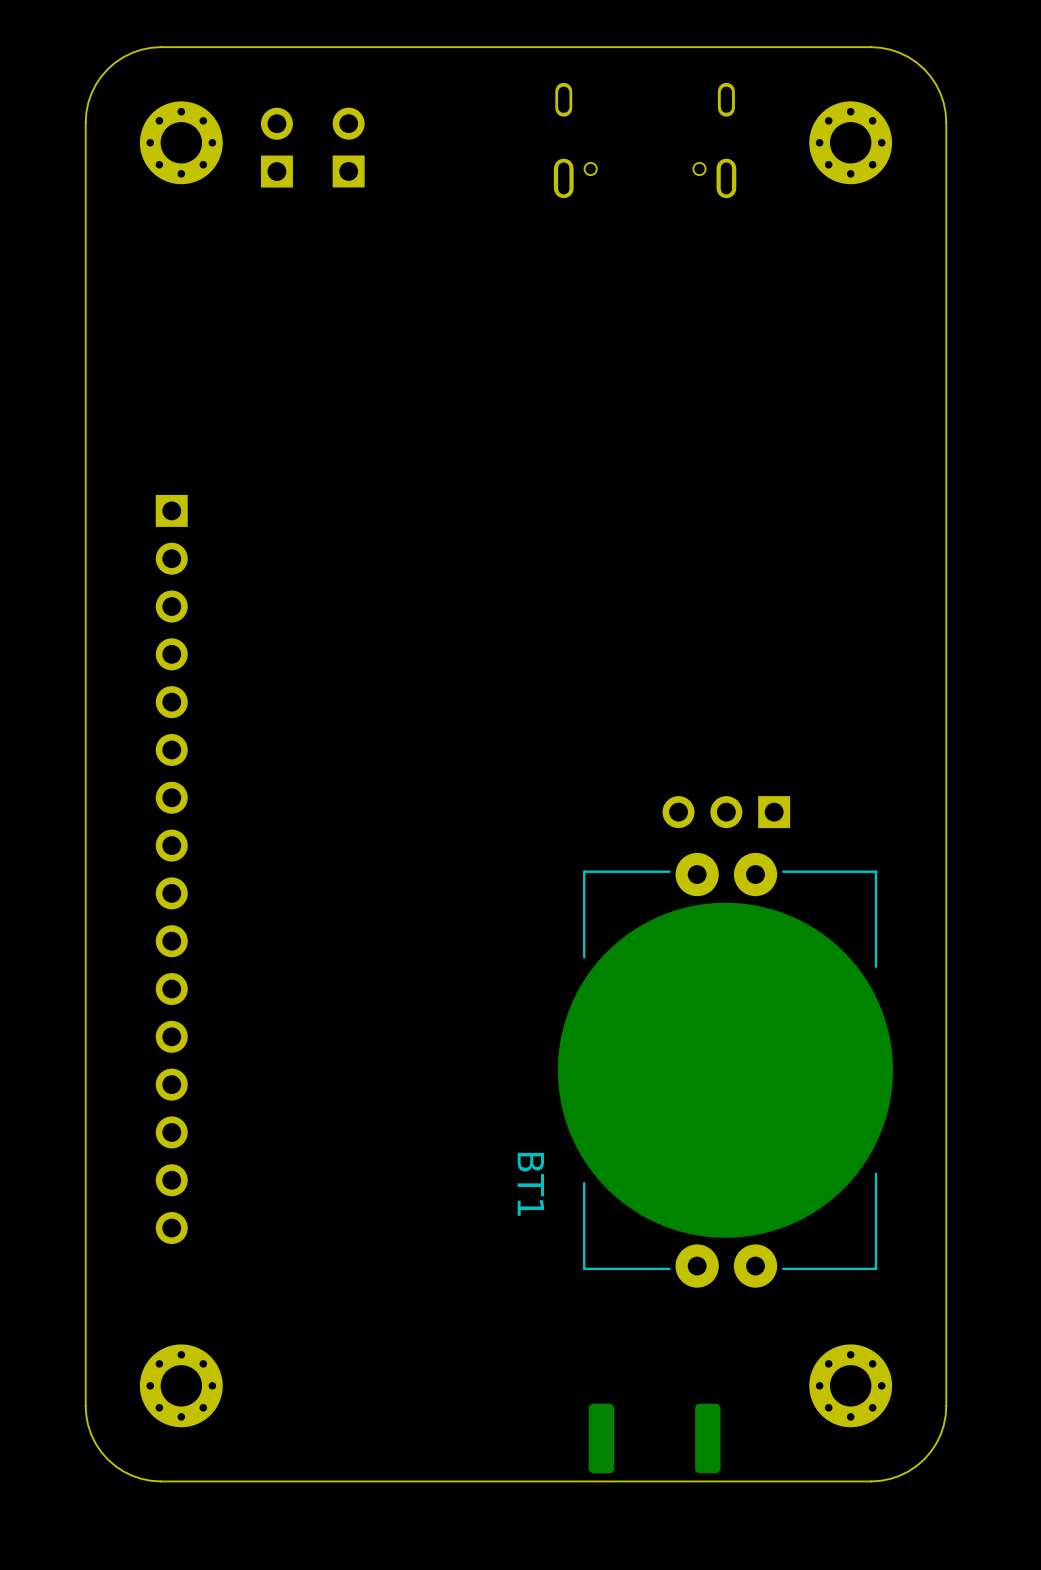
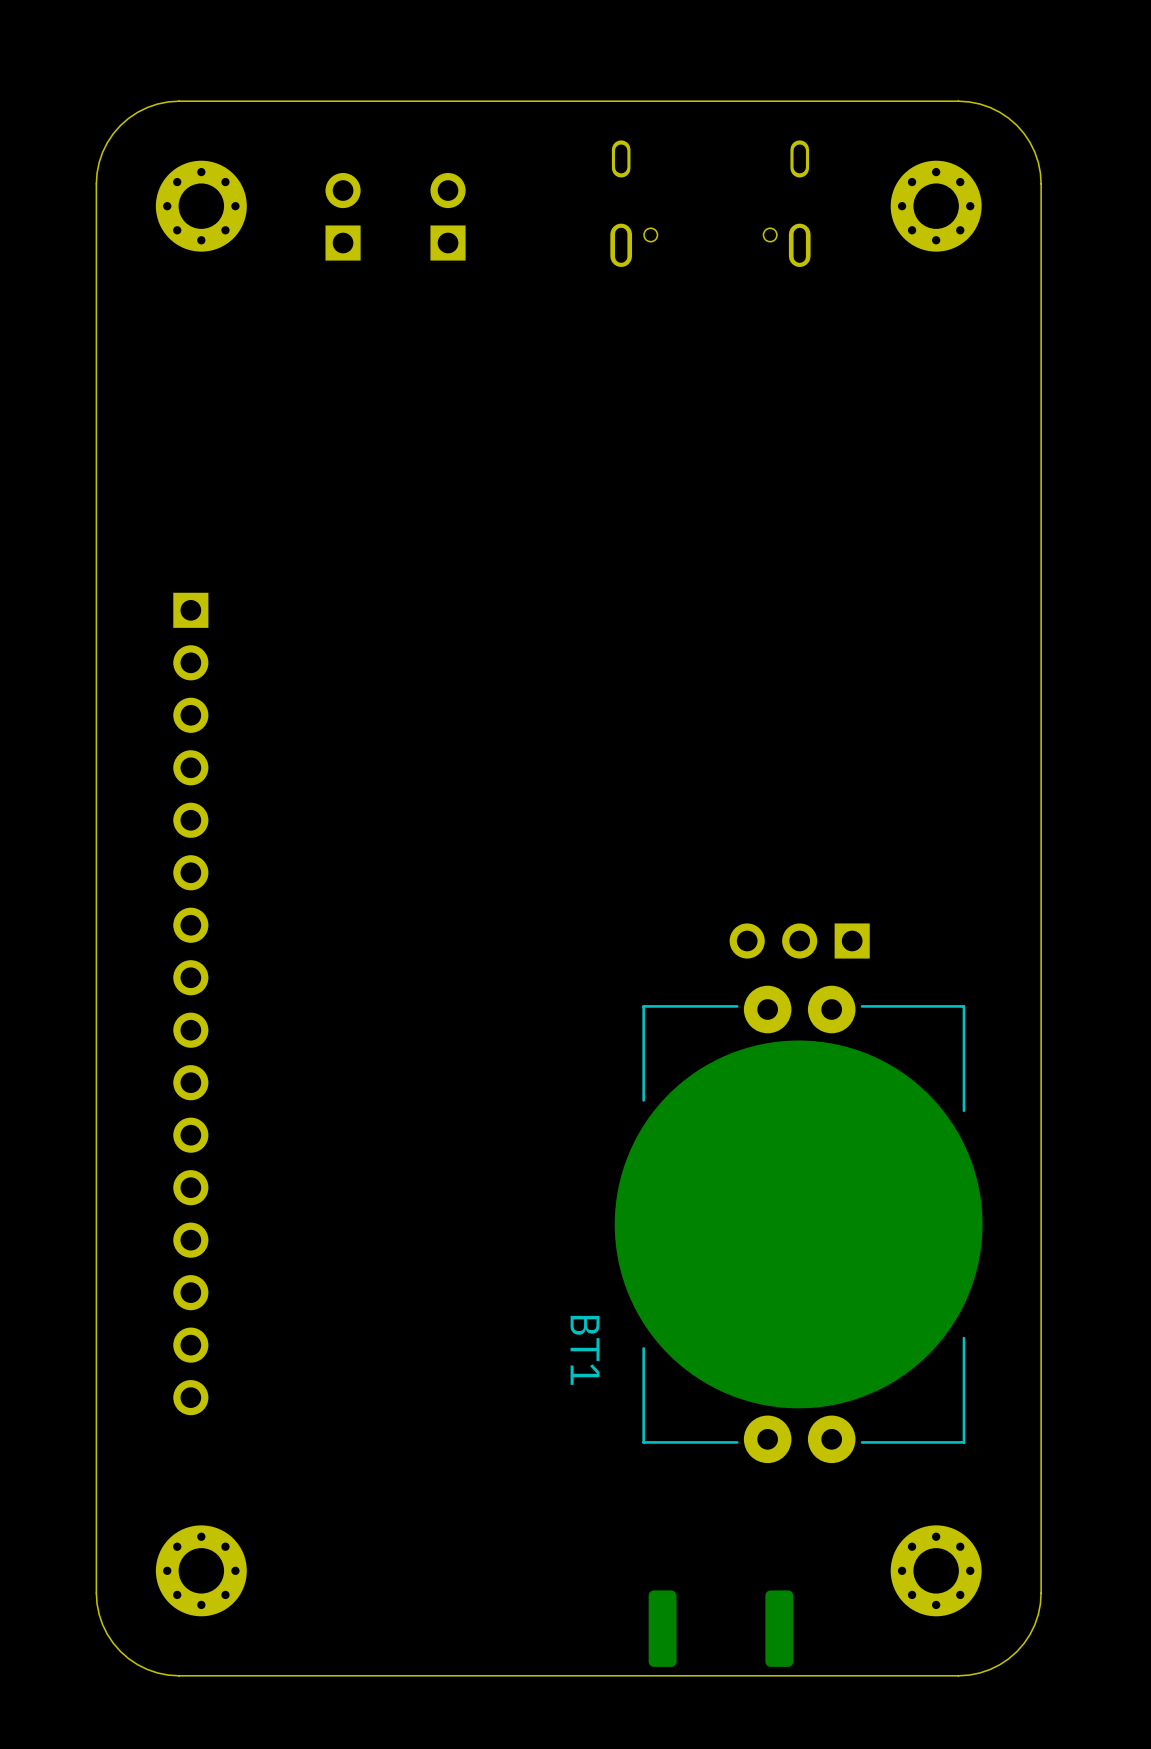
part: (276, 147) -> none
part: (348, 147) -> none
part: none -> (343, 216)
part: none -> (448, 216)

